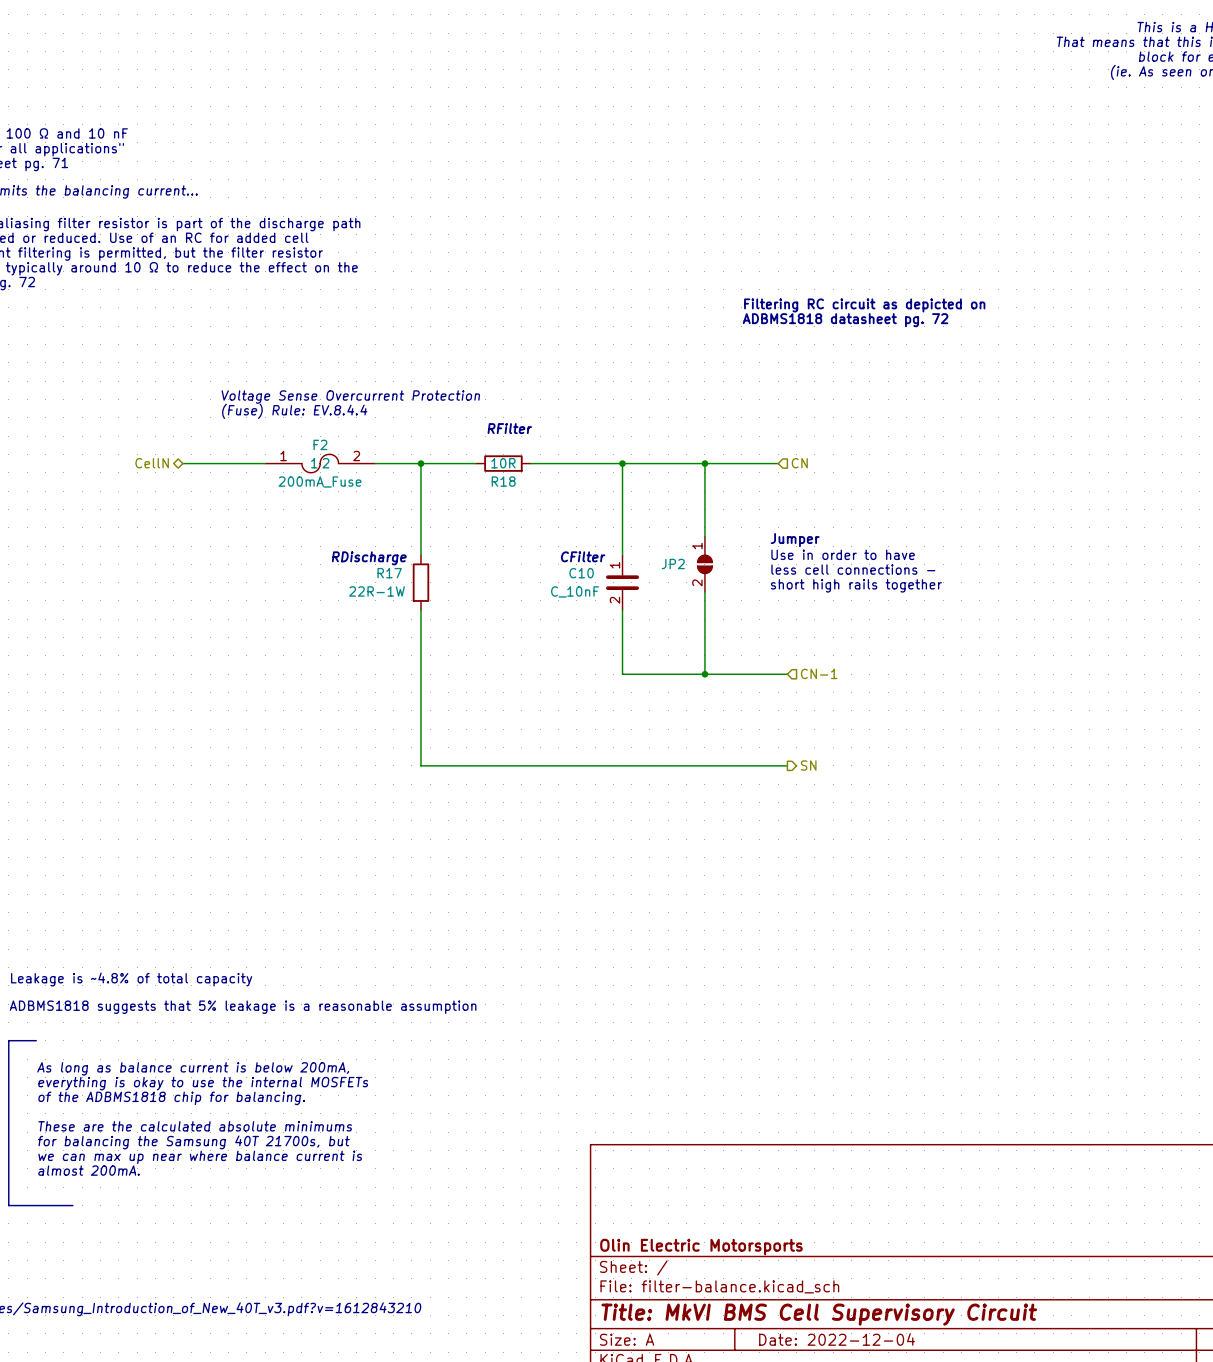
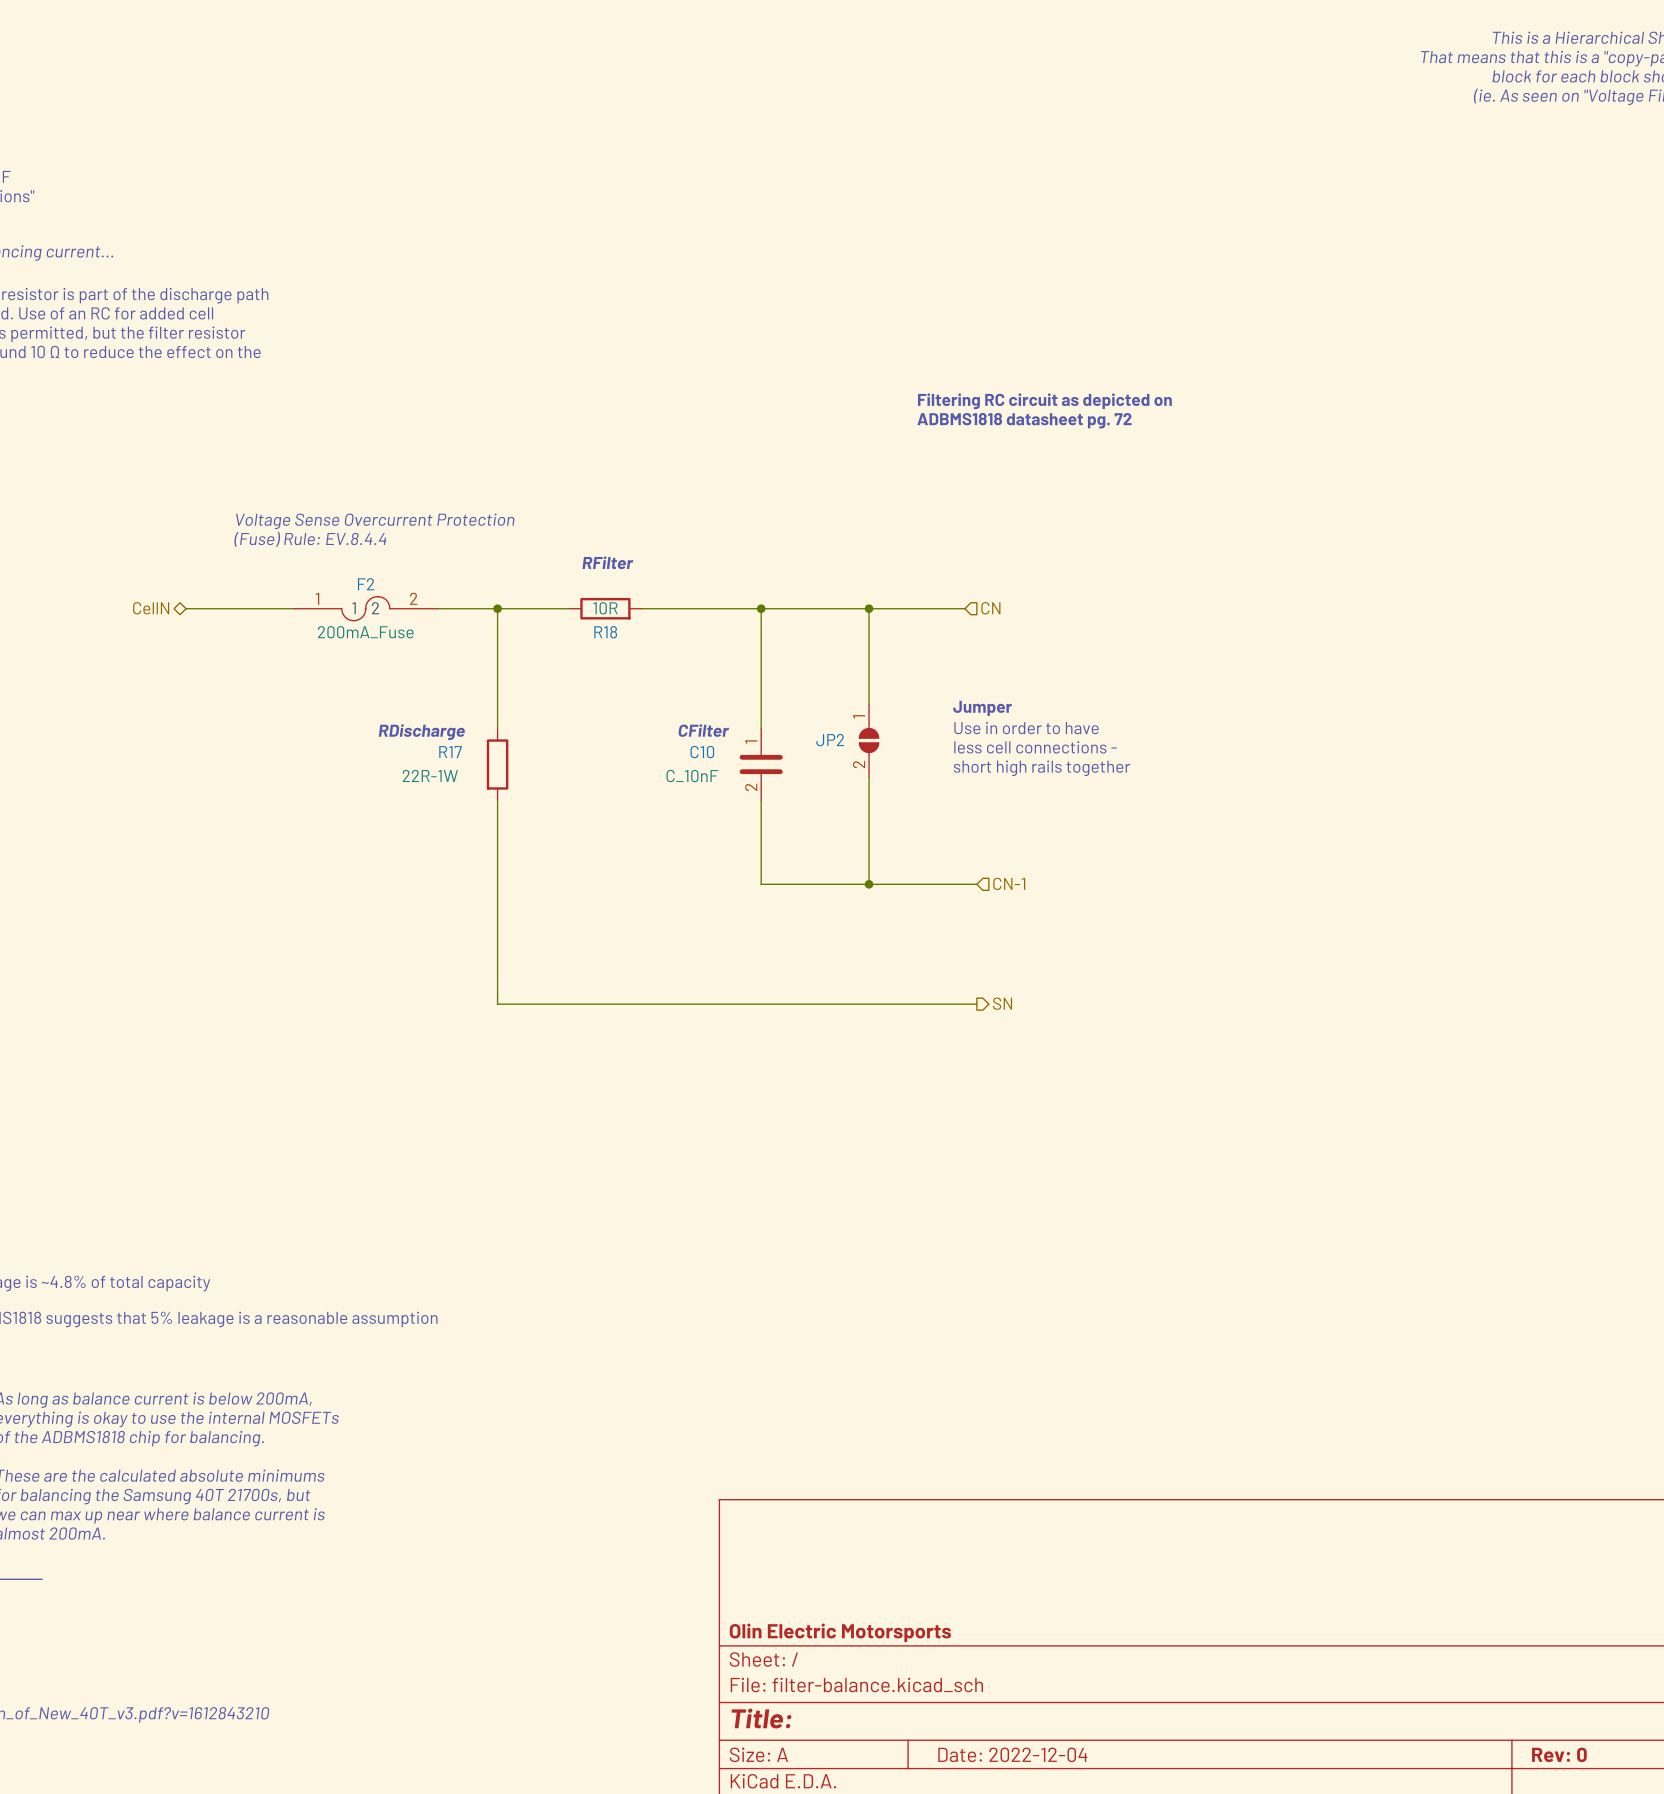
title block: Title: MkVI BMS Cell Supervisory Circuit (819, 1314) -> Title: (761, 1718)

